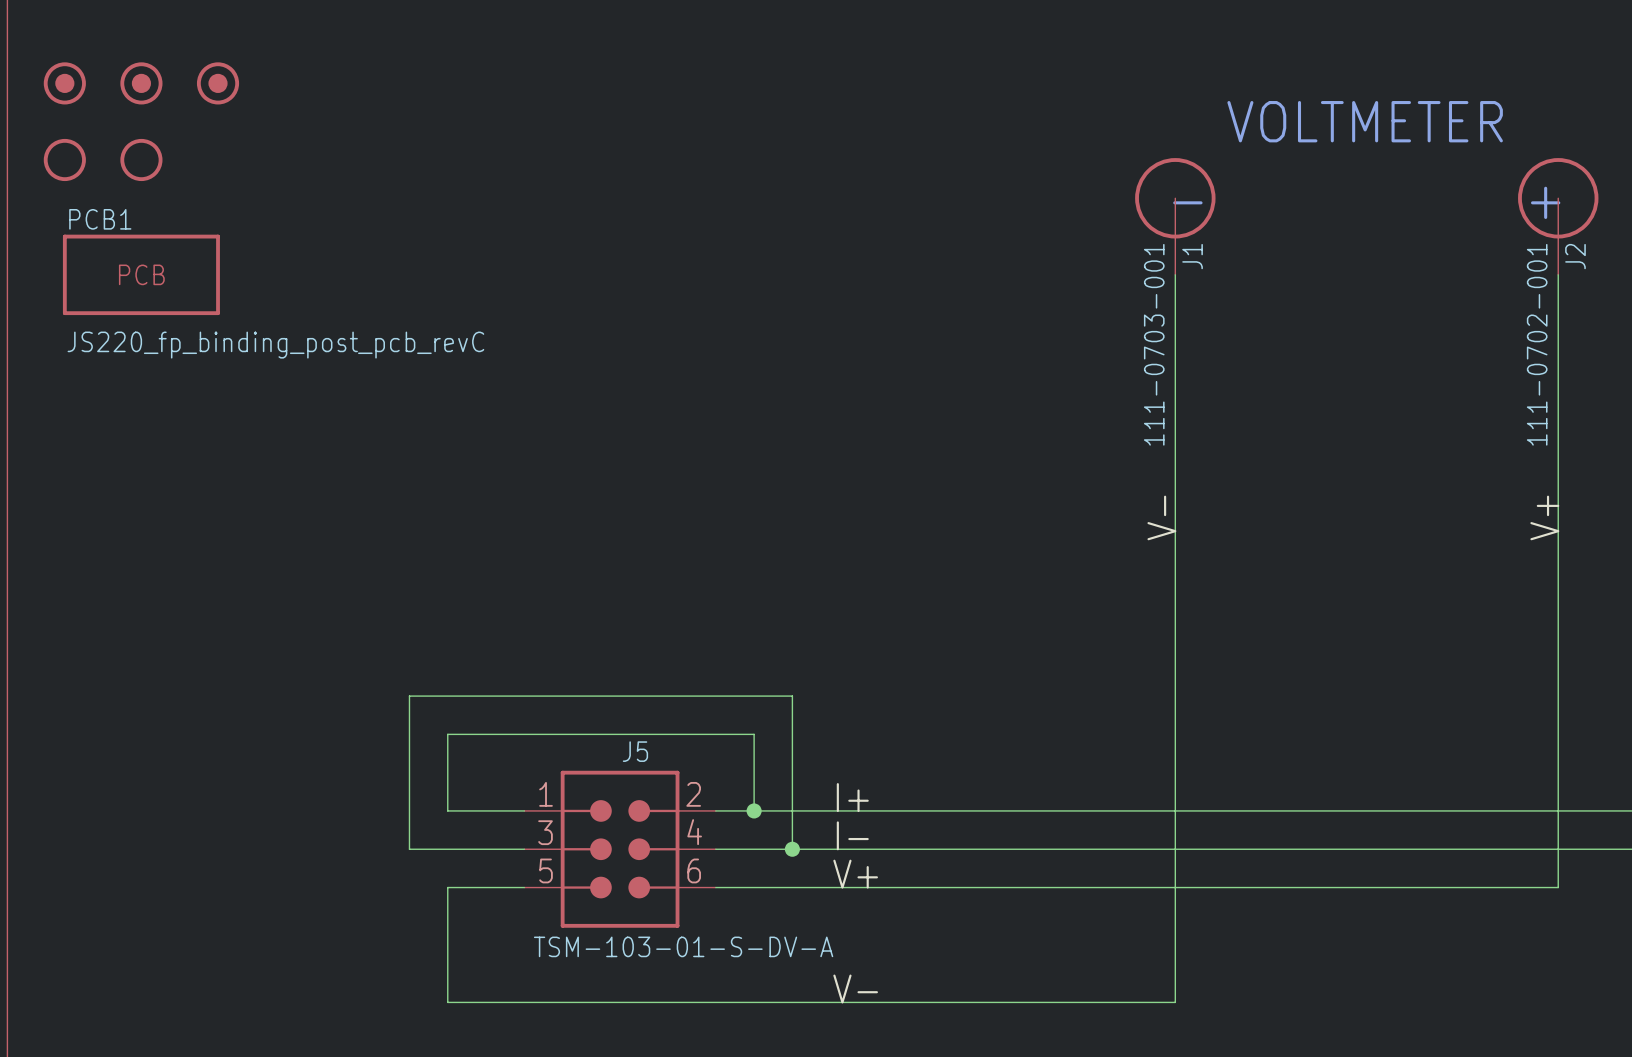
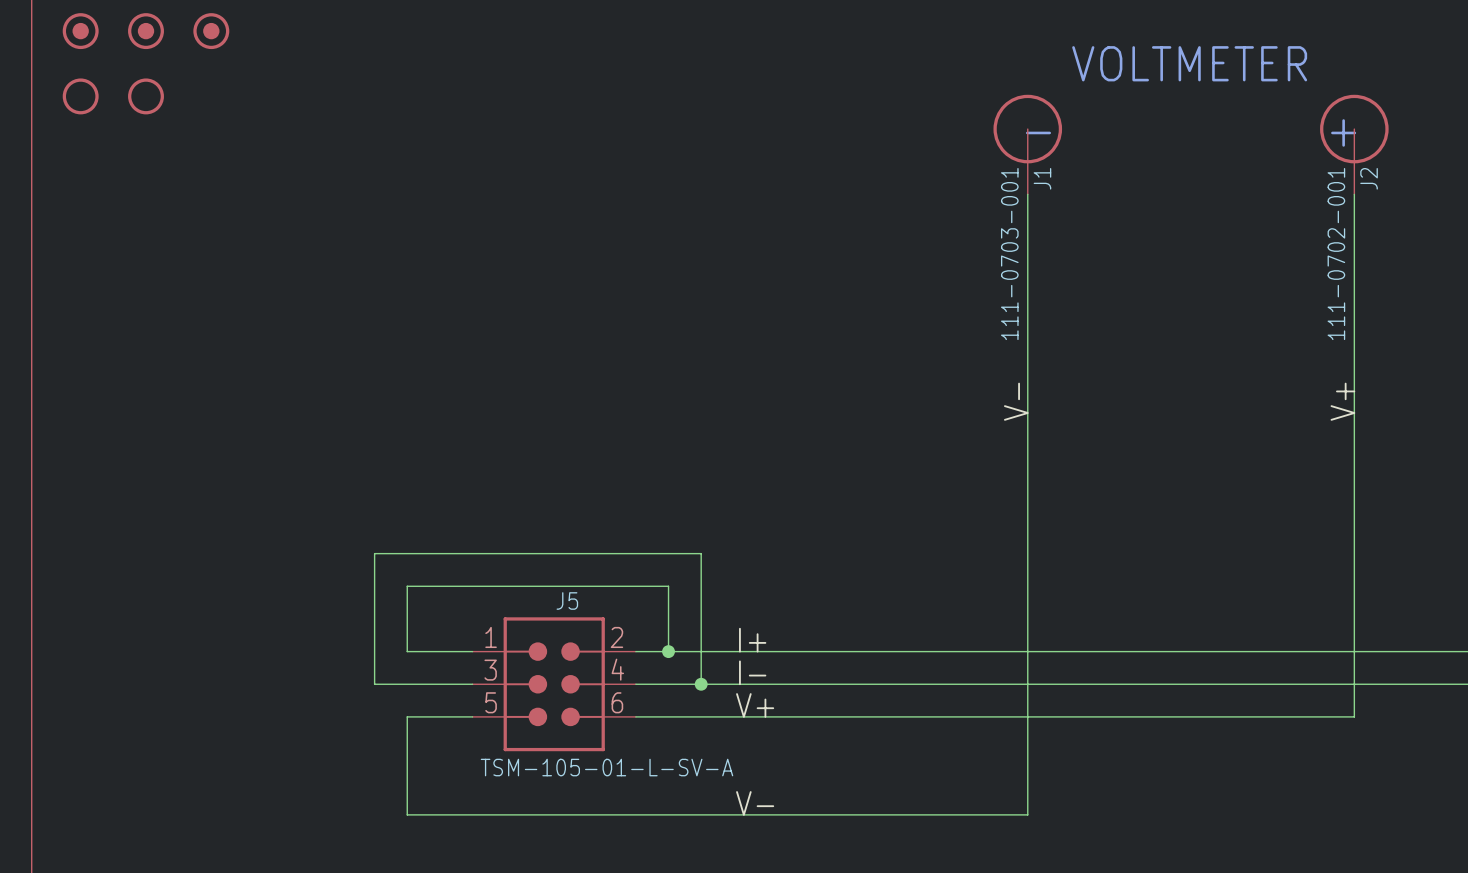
PCB1: JS220_fp_binding_post_pcb_revC (141, 274) -> none
J5 value: TSM-103-01-S-DV-A (683, 946) -> TSM-105-01-L-SV-A (606, 767)

